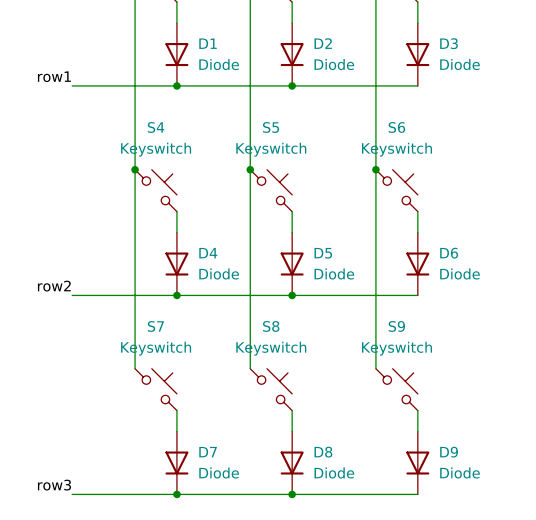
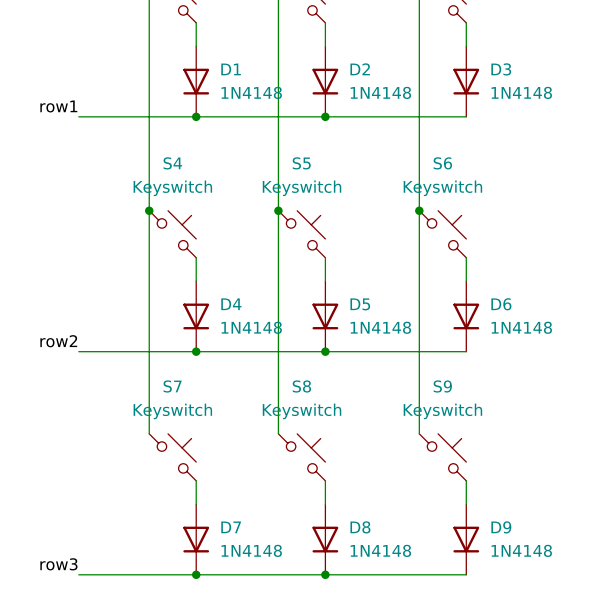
D1 value: Diode (219, 64) -> 1N4148 (251, 92)
D2 value: Diode (334, 64) -> 1N4148 (380, 92)
D3 value: Diode (460, 64) -> 1N4148 (521, 92)
D4 value: Diode (219, 273) -> 1N4148 (251, 327)
D5 value: Diode (334, 273) -> 1N4148 (380, 327)
D6 value: Diode (460, 273) -> 1N4148 (521, 327)
D7 value: Diode (219, 472) -> 1N4148 (251, 550)
D8 value: Diode (334, 472) -> 1N4148 (380, 550)
D9 value: Diode (460, 472) -> 1N4148 (521, 550)

